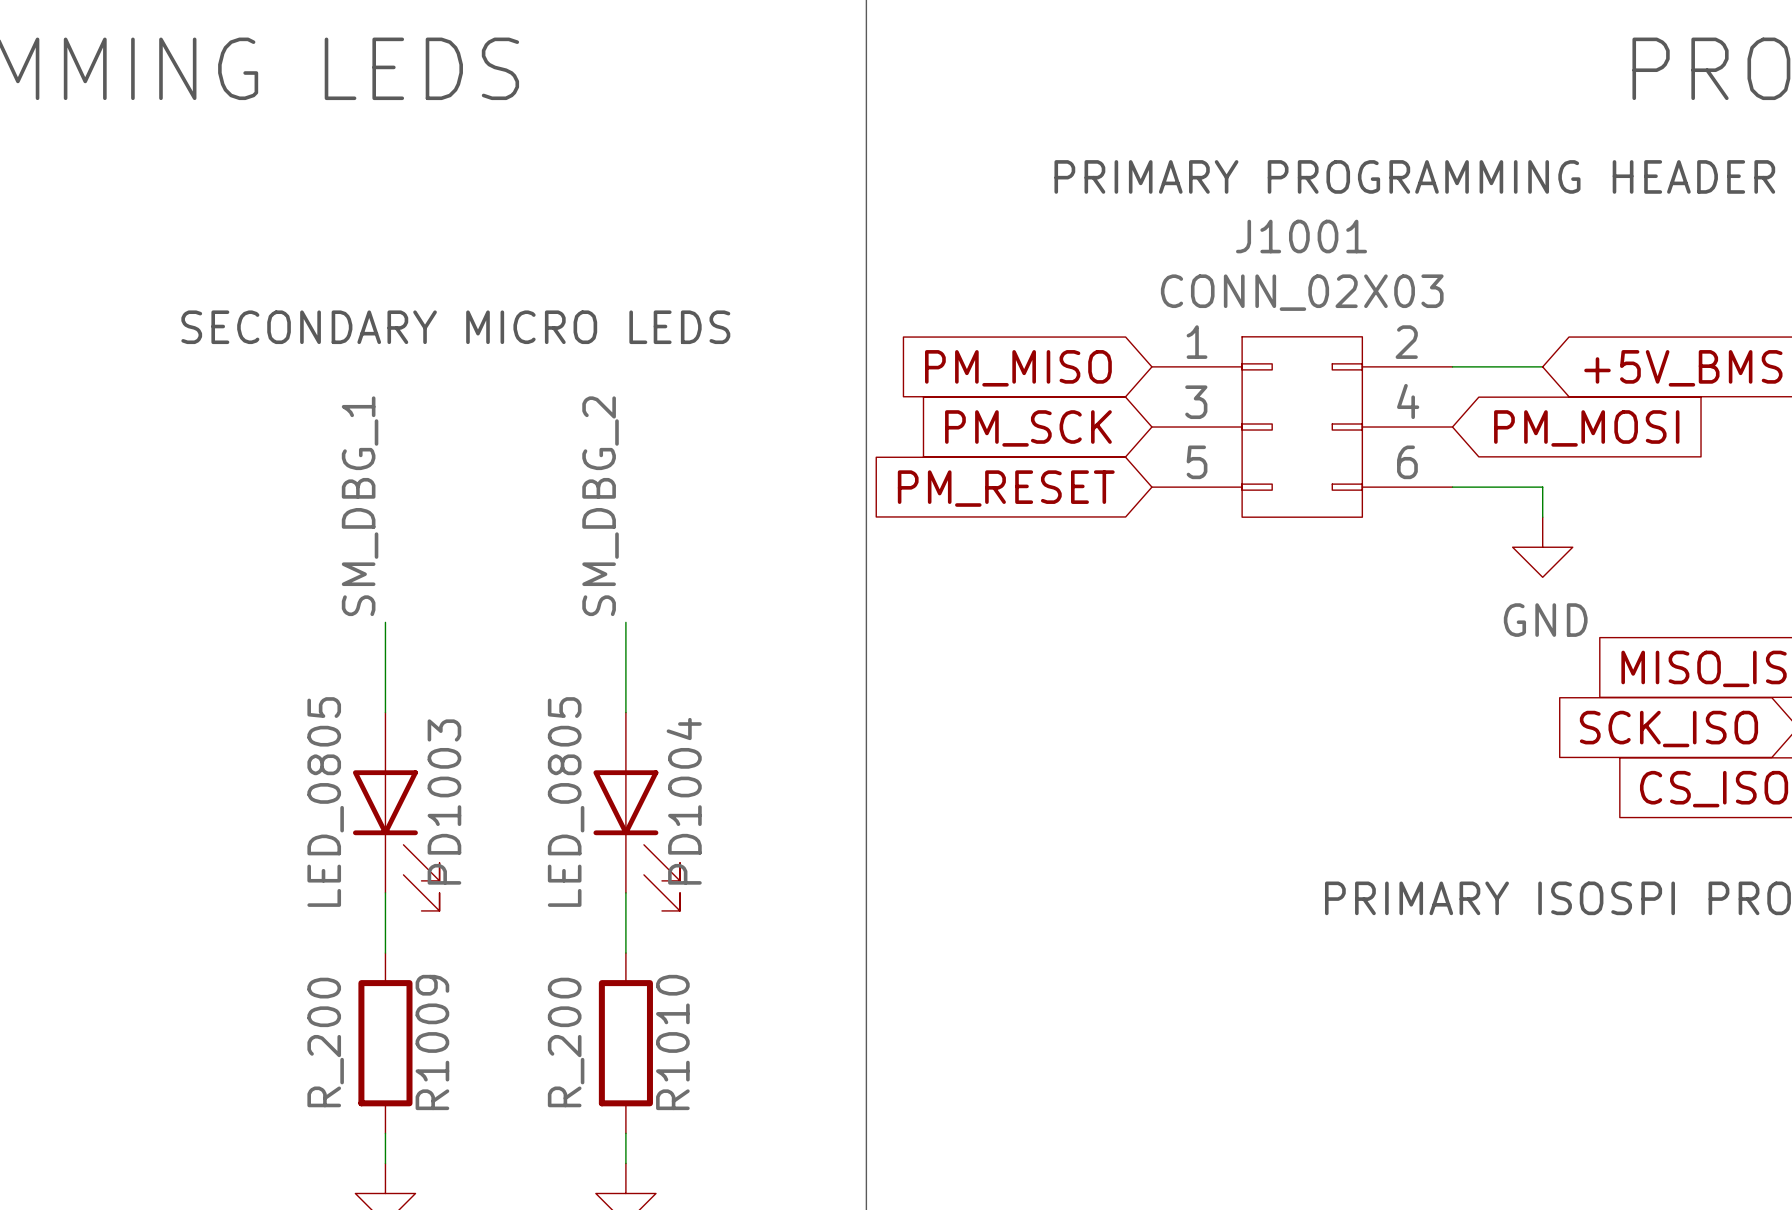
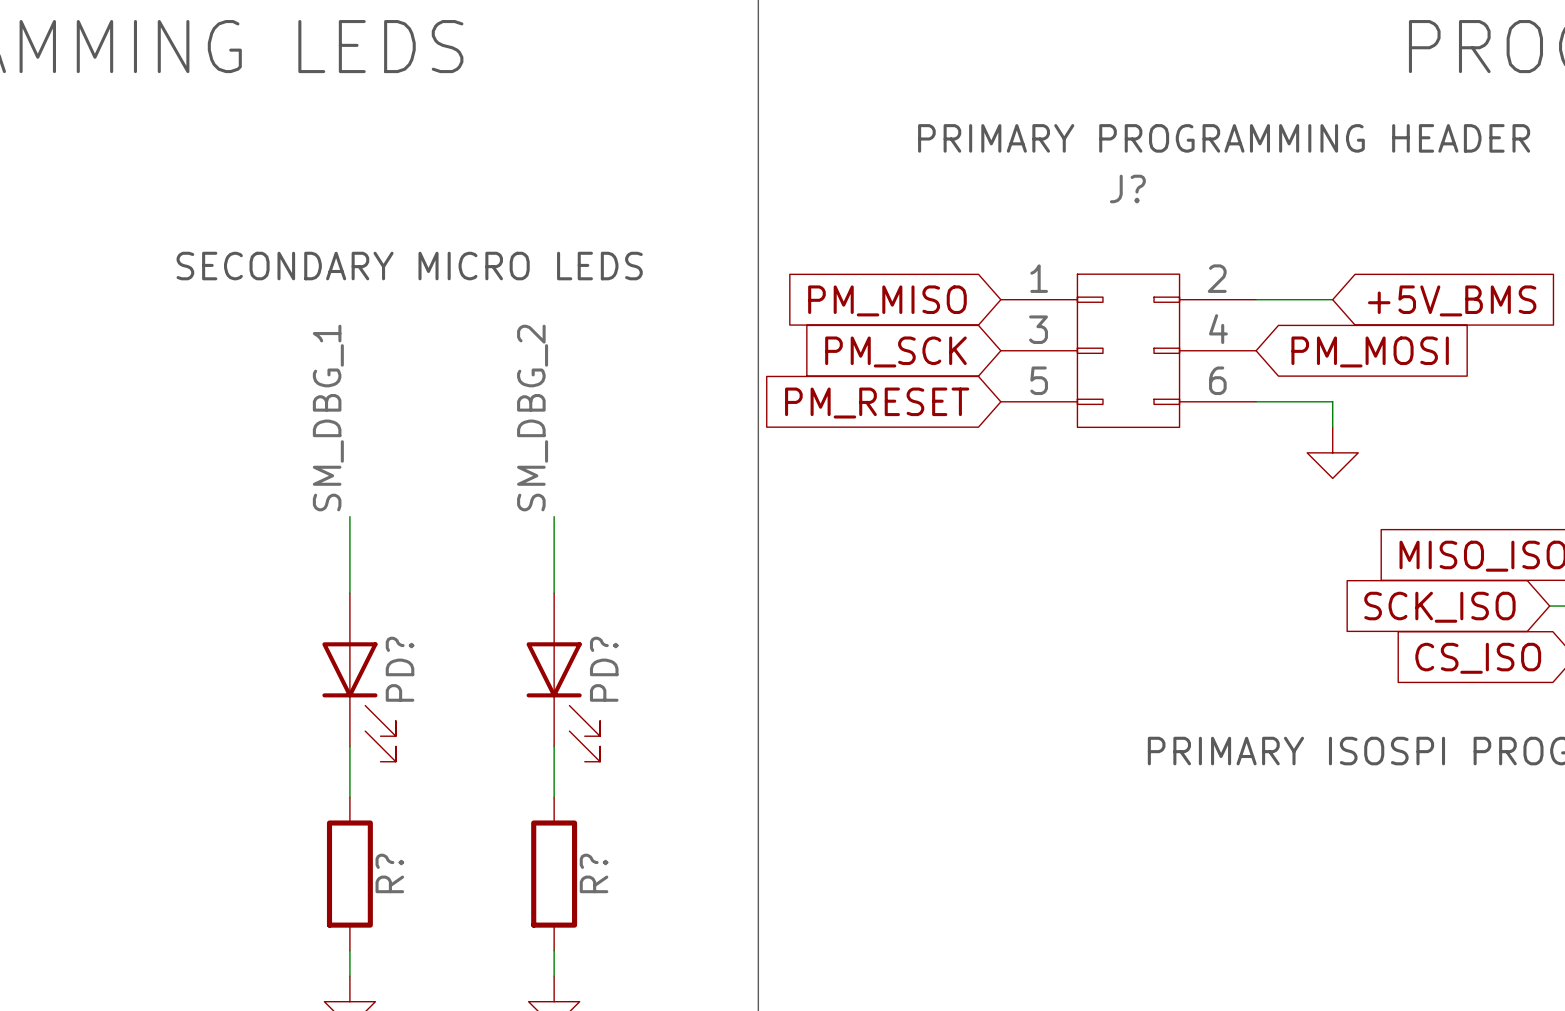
J1001 name: J1001 (1301, 236) -> J? (1127, 188)
J1001 value: CONN_02X03 (1302, 292) -> none
power symbol text: GND (1545, 620) -> none
PD1004 name: PD1004 (684, 801) -> PD? (604, 669)
PD1003 value: LED_0805 (325, 802) -> none
PD1003 name: PD1003 (444, 802) -> PD? (400, 669)
PD1004 value: LED_0805 (566, 802) -> none
R1009 value: R_200 (325, 1042) -> none
R1009 name: R1009 (432, 1042) -> R? (389, 873)
R1010 value: R_200 (566, 1042) -> none
R1010 name: R1010 (672, 1042) -> R? (594, 873)

